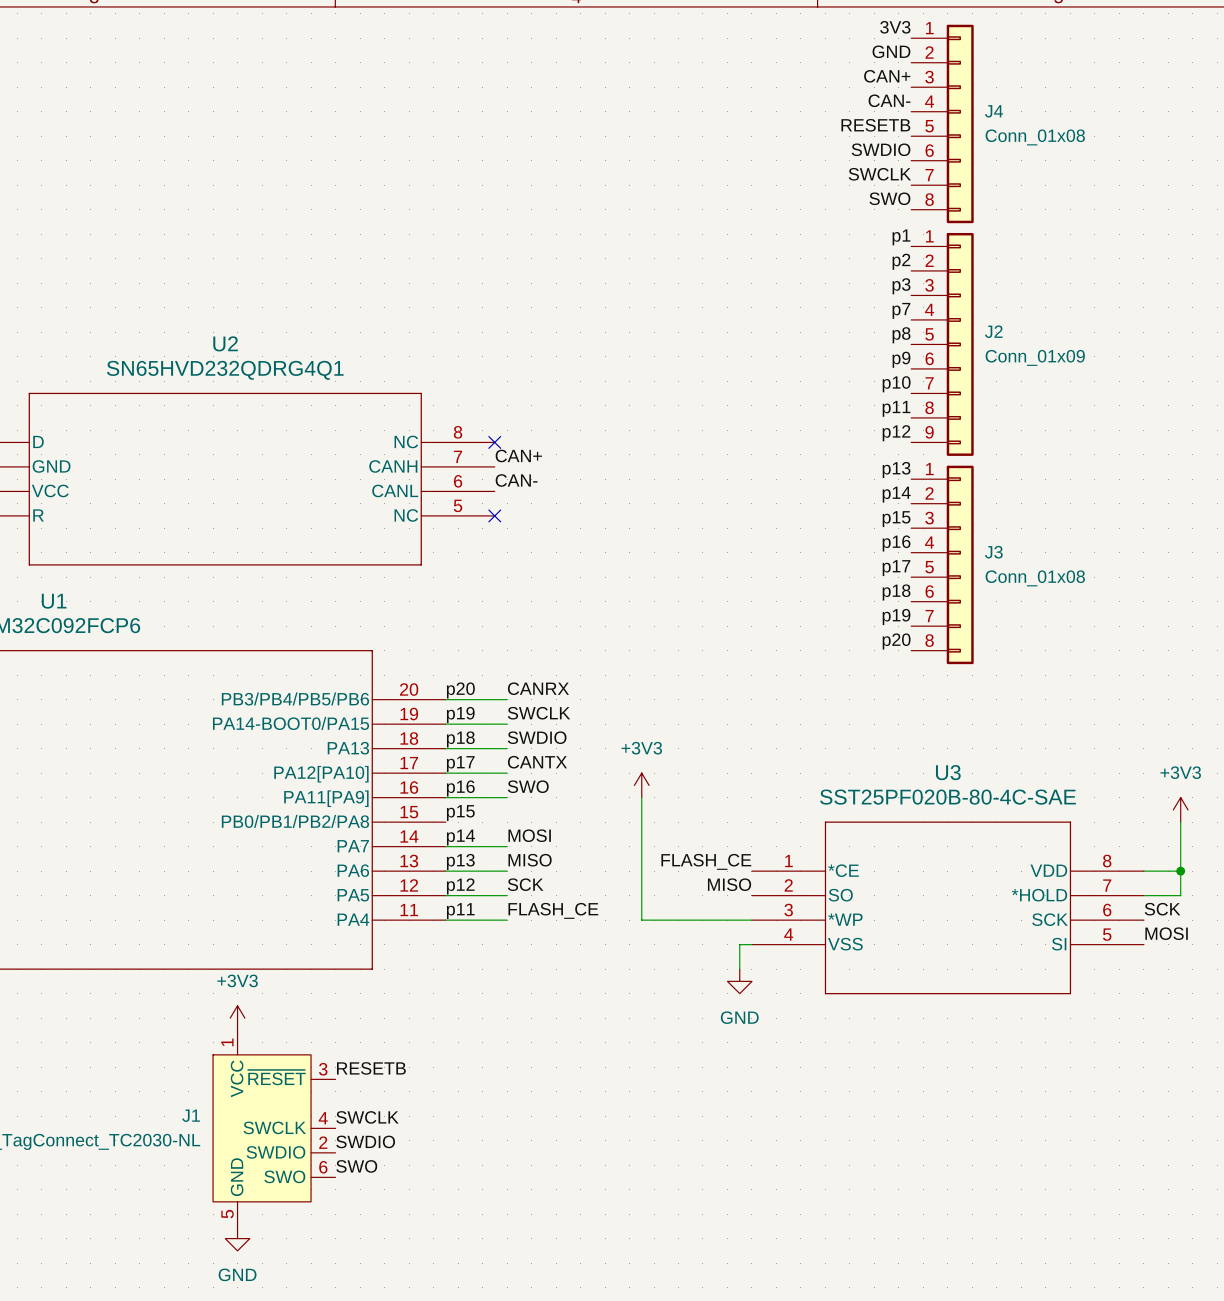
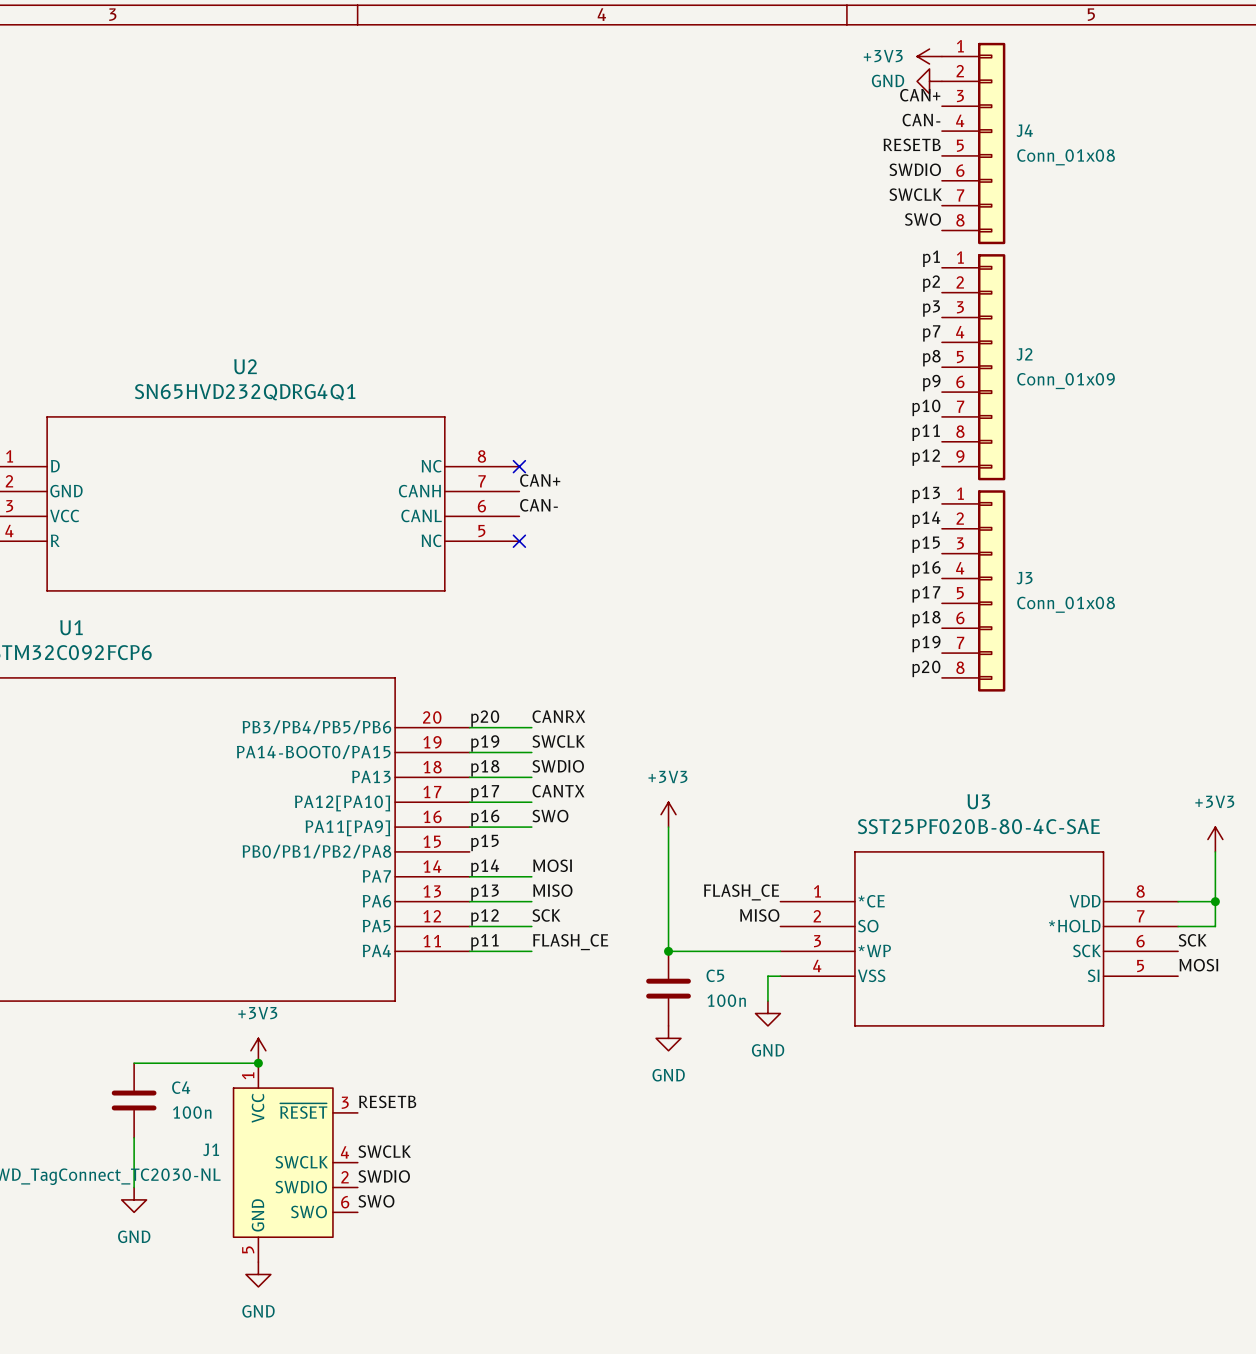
label: 3V3 (895, 27) -> none
power symbol: none -> +3V3 (929, 56)
label: GND (891, 51) -> none
power symbol: none -> GND (929, 81)
junction: none -> (668, 951)
C5: none -> 100n (668, 988)
power symbol: none -> GND (668, 1038)
wire: none -> (134, 1063) (258, 1063)
junction: none -> (258, 1063)
C4: none -> 100n (134, 1100)
wire: none -> (134, 1137) (134, 1187)
power symbol: none -> GND (134, 1199)

